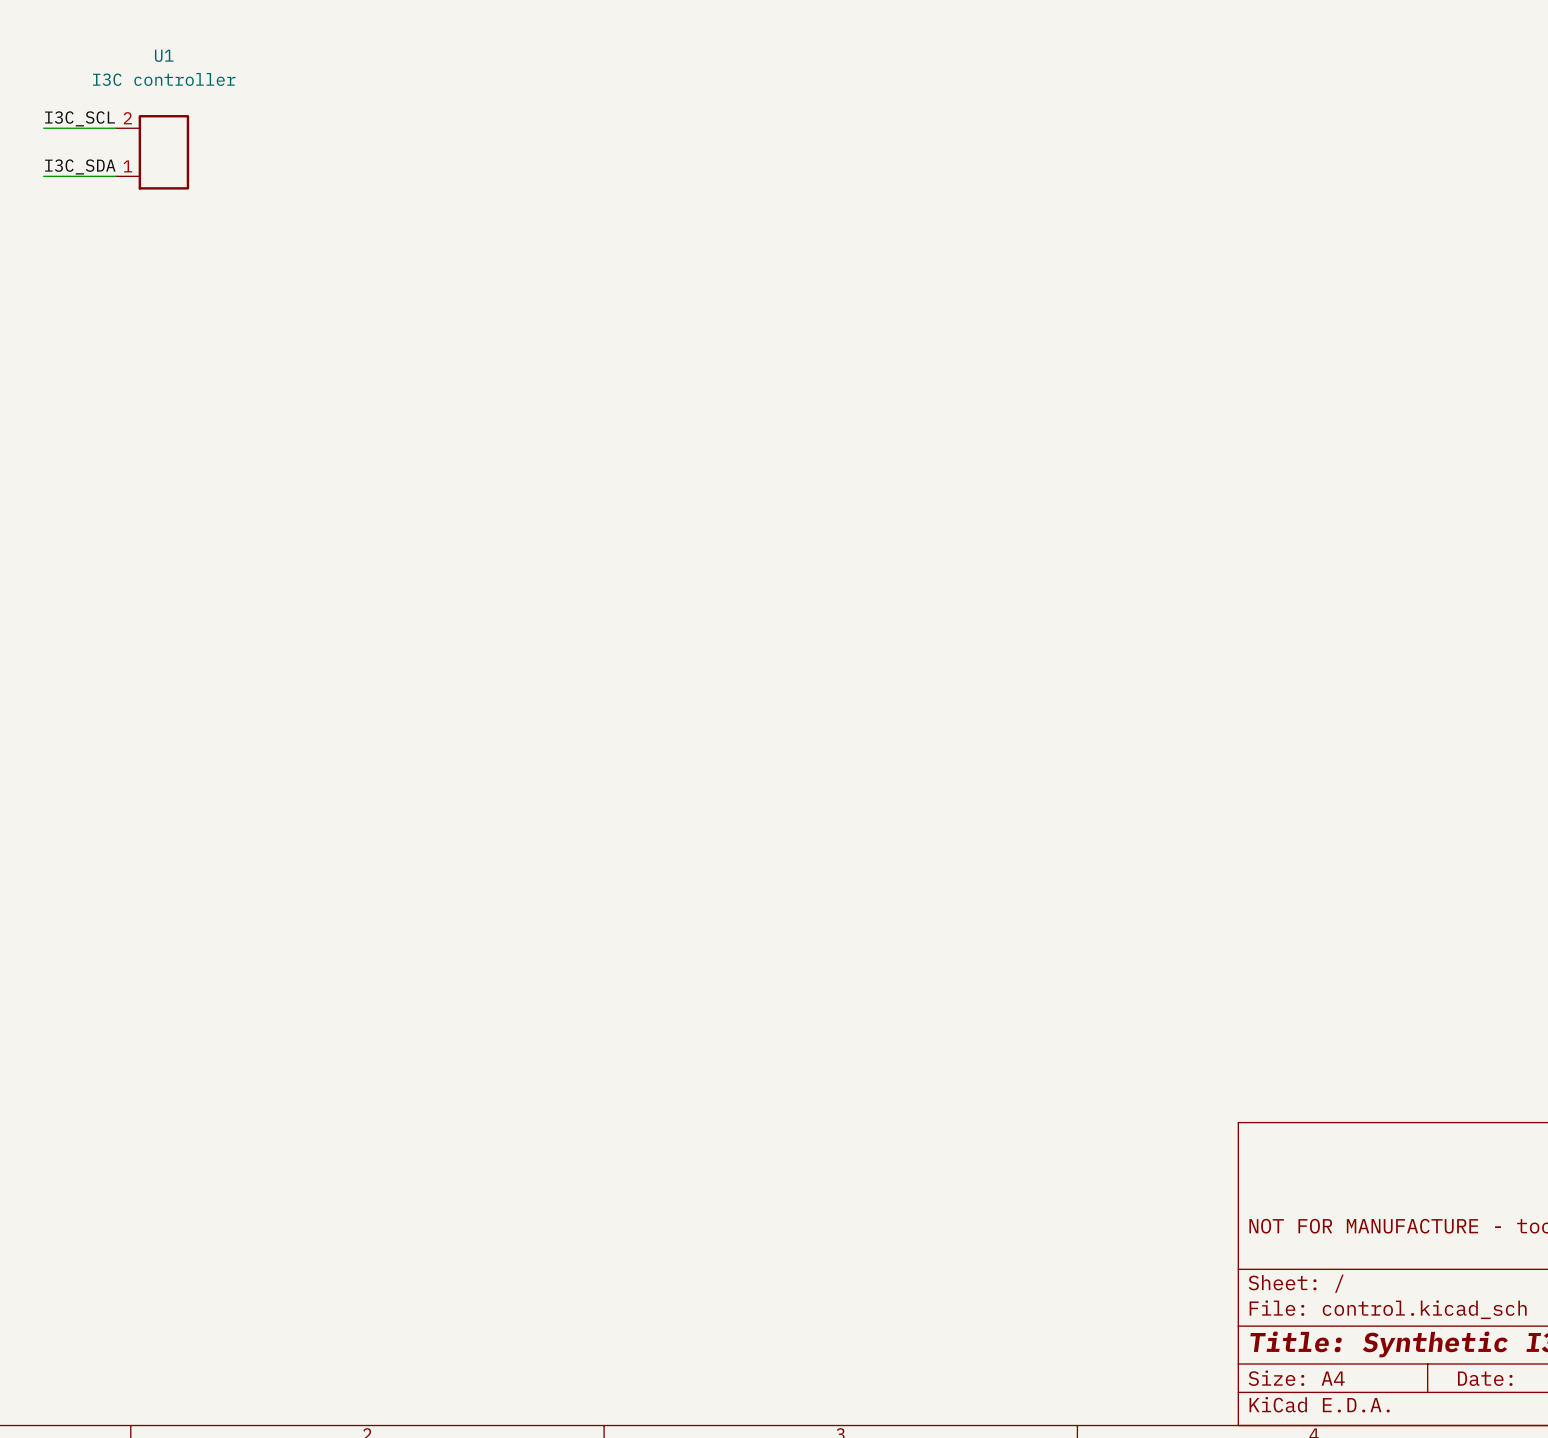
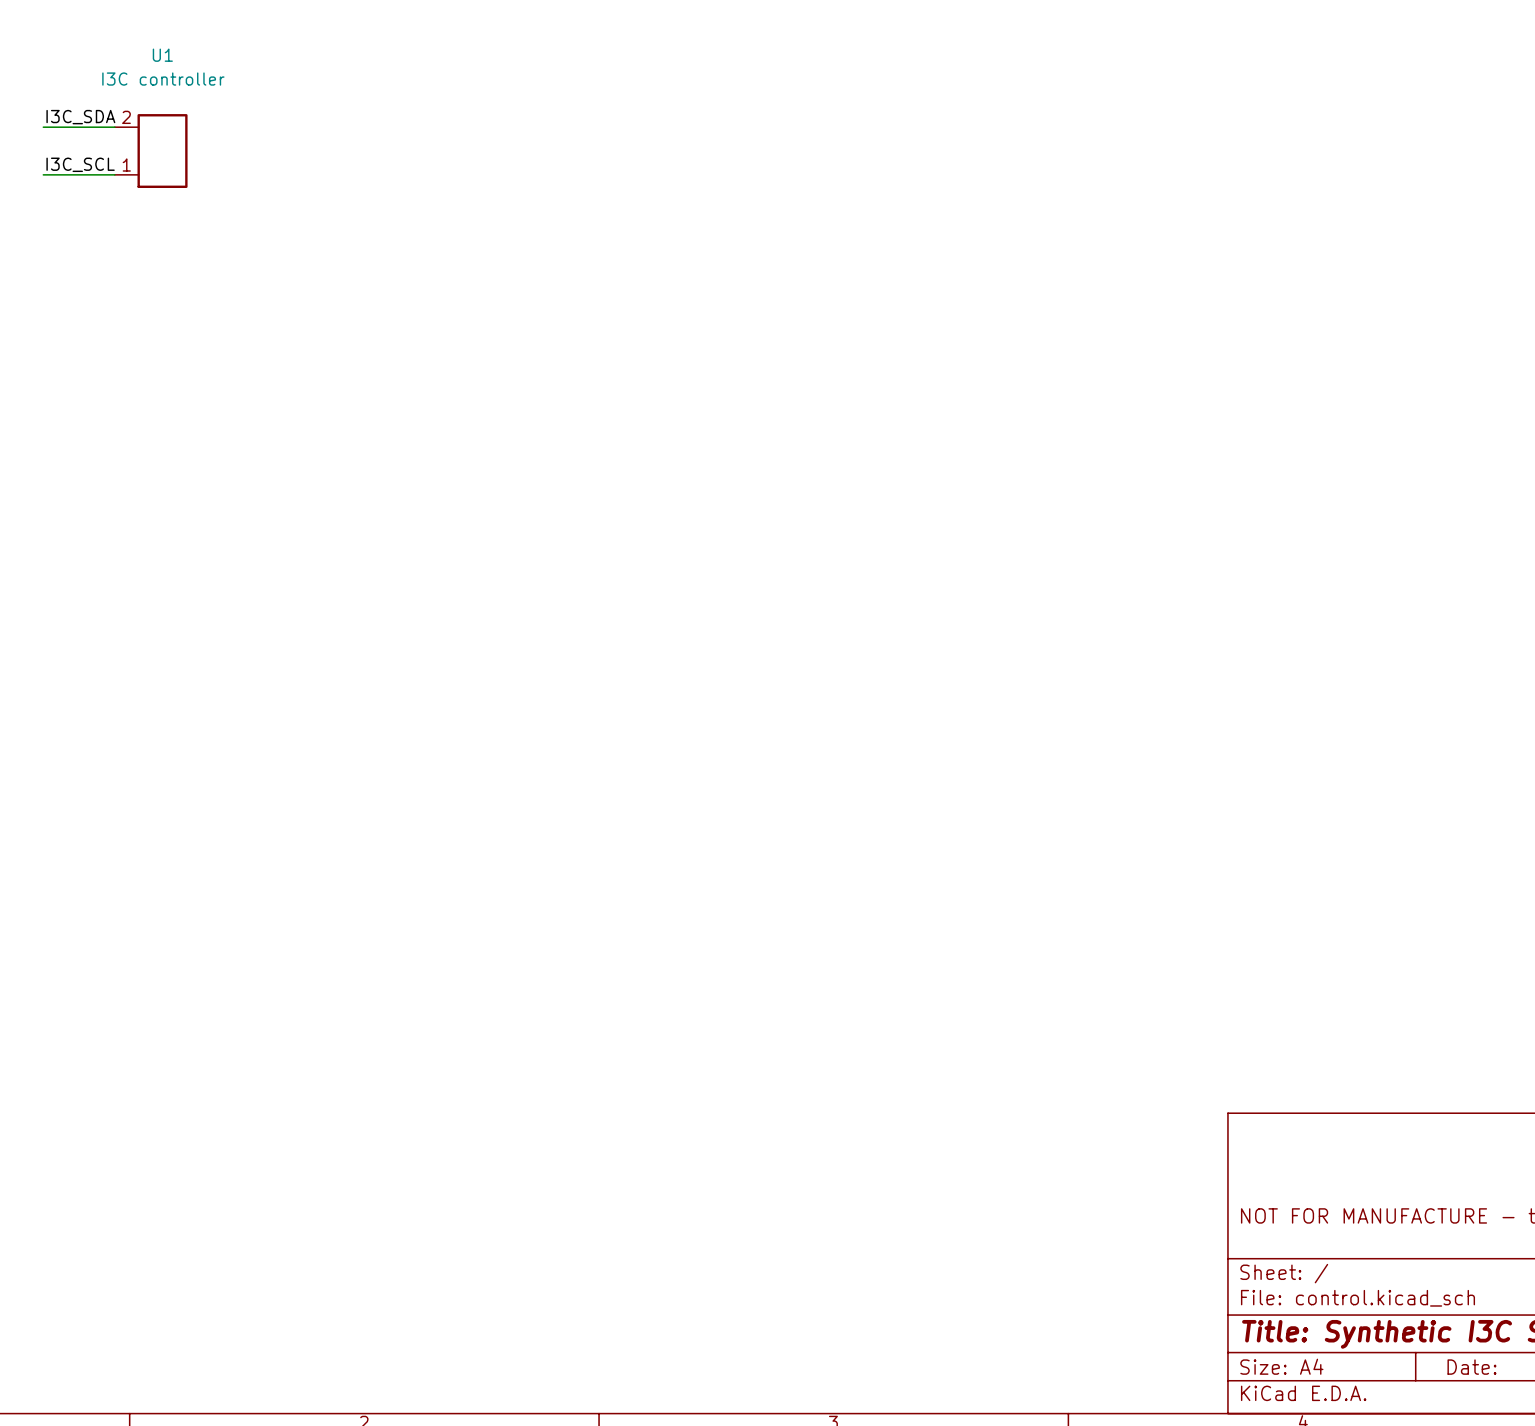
label: I3C_SCL (80, 118) -> I3C_SDA (80, 117)
label: I3C_SDA (80, 166) -> I3C_SCL (80, 164)

